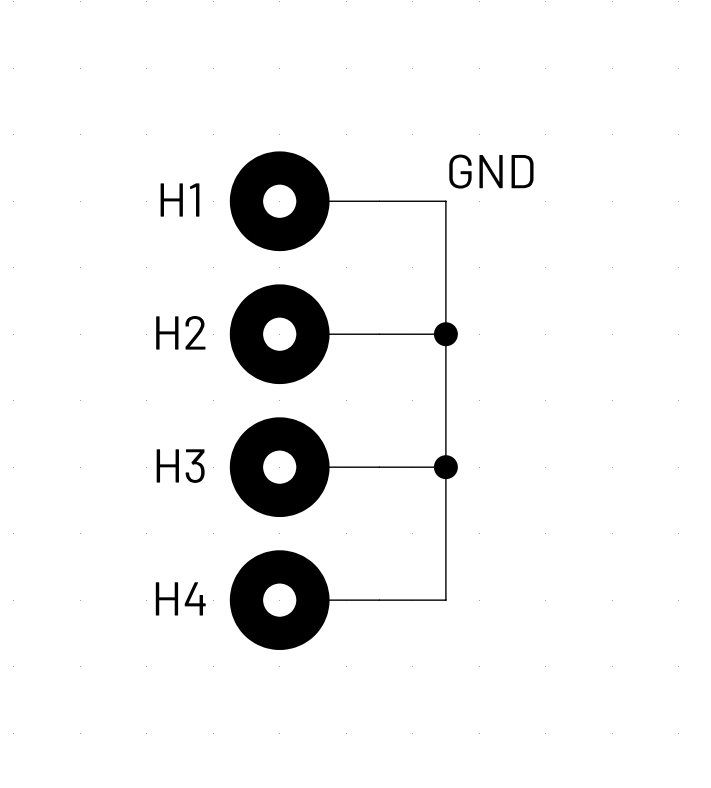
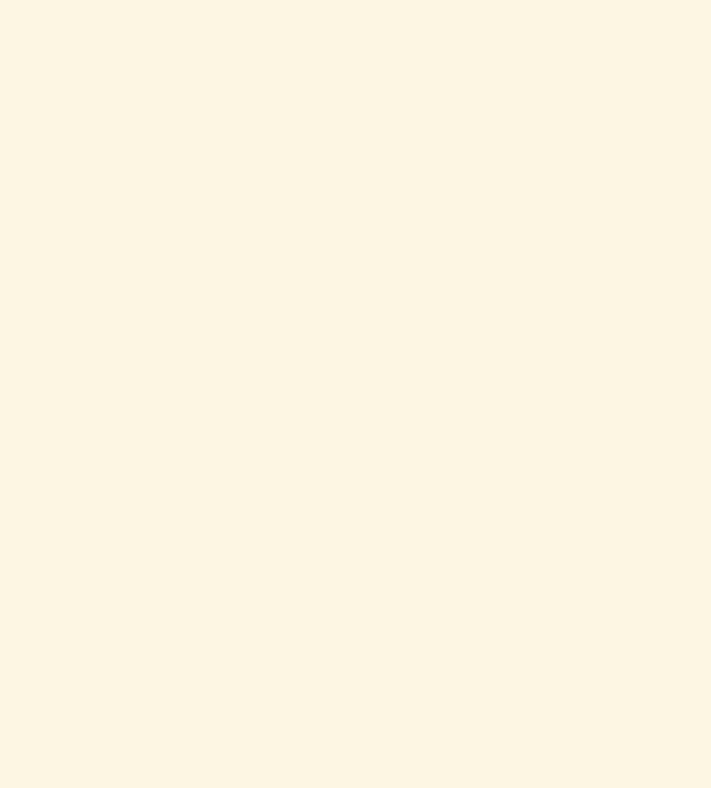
label: GND (491, 171) -> none
H1: (304, 201) -> none
wire: (379, 201) (445, 201) (445, 600) (379, 600) -> none
H2: (304, 334) -> none
wire: (379, 334) (445, 334) -> none
junction: (445, 334) -> none
H3: (304, 467) -> none
wire: (379, 467) (445, 467) -> none
junction: (445, 467) -> none
H4: (304, 600) -> none

